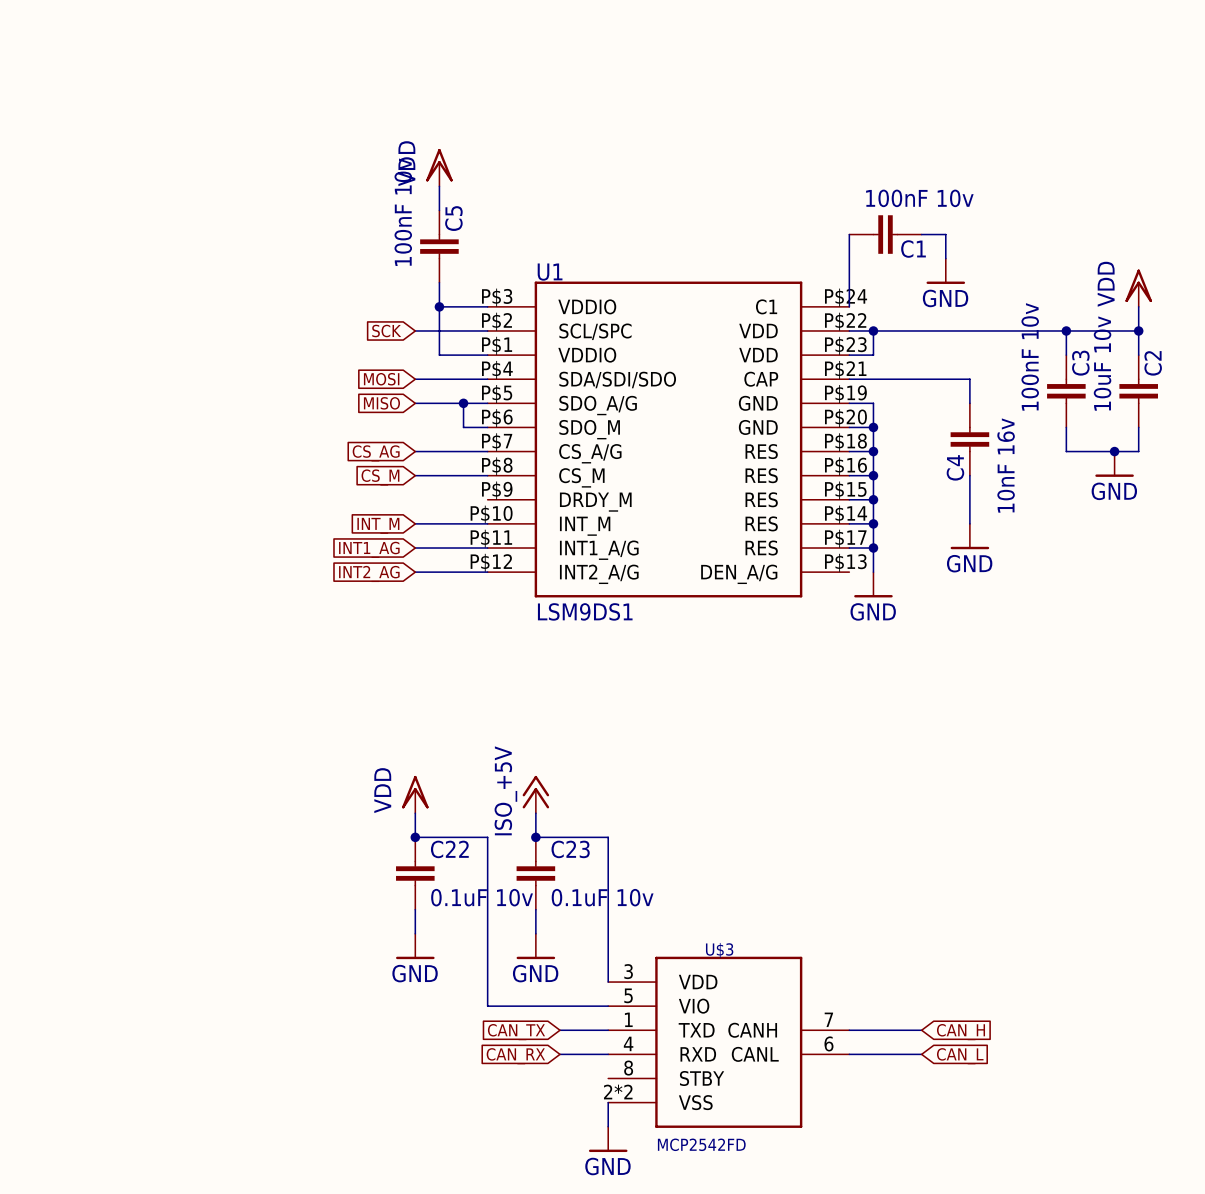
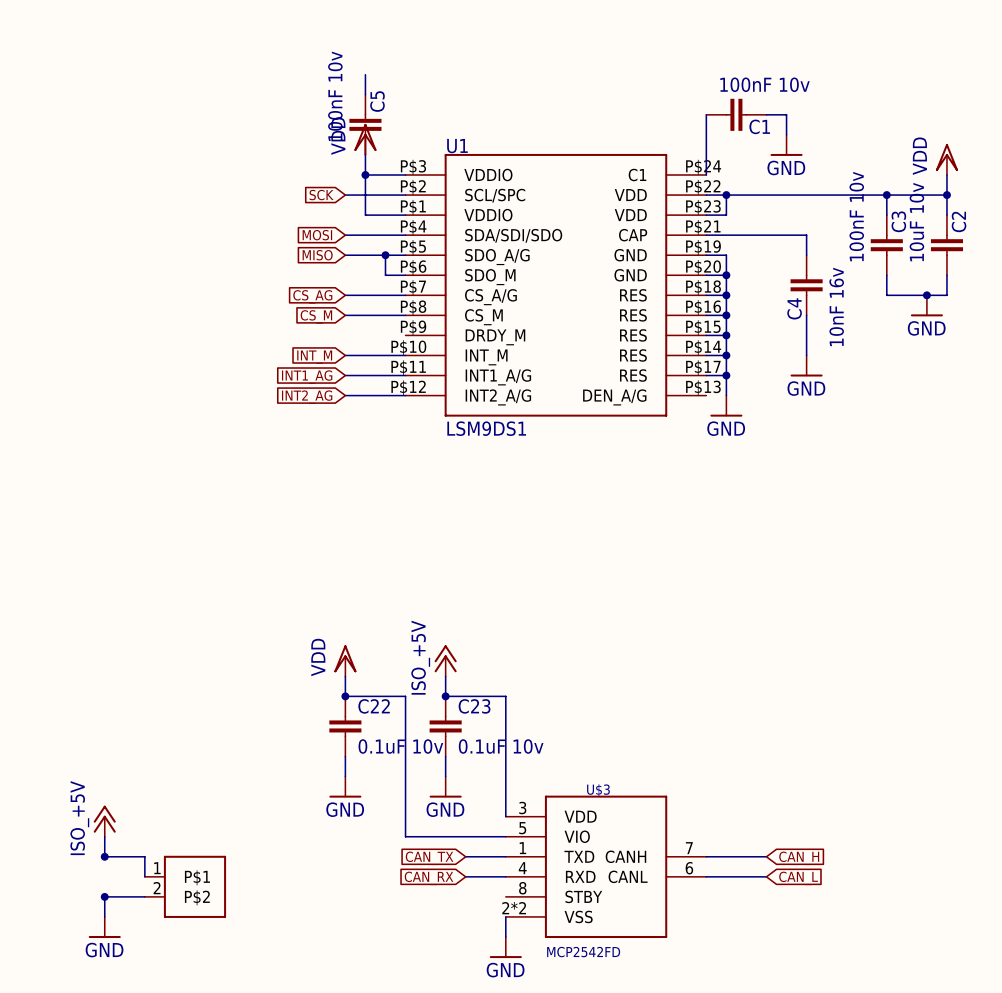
wire: none -> (365, 74) (365, 94)
wire: none -> (706, 114) (706, 175)
wire: none -> (766, 114) (786, 114) (786, 134)
power symbol: none -> GND (786, 145)
junction: none -> (365, 175)
wire: none -> (405, 175) (365, 175) (365, 215) (405, 215)
wire: none -> (946, 175) (946, 215)
wire: none -> (345, 195) (405, 195)
wire: (849, 234) (849, 306) -> (726, 275) (726, 255) (706, 255)
wire: none -> (726, 195) (726, 215) (706, 215)
junction: none -> (726, 195)
C1 position: (885, 234) -> (736, 114)
wire: (945, 234) (945, 258) -> (786, 195) (946, 195)
wire: none -> (886, 195) (886, 215)
junction: none -> (886, 195)
junction: none -> (946, 195)
C5 position: (439, 246) -> (365, 124)
power symbol: GND (945, 271) -> none
global label: none -> MOSI (317, 235)
wire: (439, 282) (439, 355) -> (345, 295) (365, 295)
wire: none -> (706, 235) (806, 235) (806, 255)
power symbol position: VDD (1138, 288) -> VDD (946, 159)
wire: none -> (345, 255) (365, 255)
junction position: (439, 306) -> (385, 255)
wire: (1138, 306) (1138, 330) (873, 330) -> none
wire: (415, 330) (463, 330) -> (385, 255) (385, 275)
junction: (1066, 330) -> none
junction: (1138, 330) -> none
global label position: SCK (386, 331) -> SCK (321, 195)
junction: none -> (726, 295)
wire: none -> (886, 295) (946, 295)
junction: none -> (926, 295)
global label: none -> CS_AG (312, 296)
power symbol: none -> GND (926, 305)
global label: MOSI (381, 379) -> CS_M (316, 316)
wire: (873, 379) (969, 379) -> none
junction: none -> (726, 315)
C3 position: (1066, 391) -> (886, 245)
C2 position: (1138, 391) -> (946, 245)
global label position: MISO (381, 403) -> MISO (317, 255)
wire: (415, 403) (487, 403) -> (345, 235) (405, 235)
wire: (463, 403) (463, 427) -> (345, 355) (385, 355)
junction: (463, 403) -> none
junction: none -> (726, 335)
wire: (1066, 427) (1066, 451) (1138, 451) (1138, 427) -> none
U1 position: (668, 439) -> (555, 285)
C4 position: (969, 439) -> (806, 285)
power symbol: none -> GND (806, 366)
junction: (1114, 451) -> none
global label: CS_AG (376, 453) -> INT1_AG (307, 377)
power symbol: GND (1114, 464) -> none
wire: (849, 475) (873, 475) (873, 572) -> none
junction: (873, 475) -> none
wire: (969, 475) (969, 523) -> (726, 295) (726, 335)
global label: CS_M (380, 477) -> INT2_AG (307, 397)
power symbol: none -> GND (726, 406)
junction: (873, 499) -> none
wire: (415, 523) (487, 523) -> none
wire: (849, 523) (873, 523) -> none
junction: (873, 523) -> none
global label position: INT_M (378, 525) -> INT_M (314, 357)
power symbol: GND (969, 536) -> none
wire: (415, 548) (487, 548) -> none
wire: (849, 548) (873, 548) -> none
junction: (873, 548) -> none
global label: INT1_AG (369, 549) -> none
wire: (415, 572) (487, 572) -> none
global label: INT2_AG (369, 573) -> none
power symbol: GND (873, 584) -> none
power symbol: none -> ISO_+5V (104, 821)
wire: none -> (104, 836) (104, 856) (144, 856) (144, 876)
junction: none -> (104, 856)
part: none -> (185, 886)
junction: none -> (104, 896)
wire: none -> (144, 896) (104, 896) (104, 916)
power symbol: none -> GND (104, 927)

